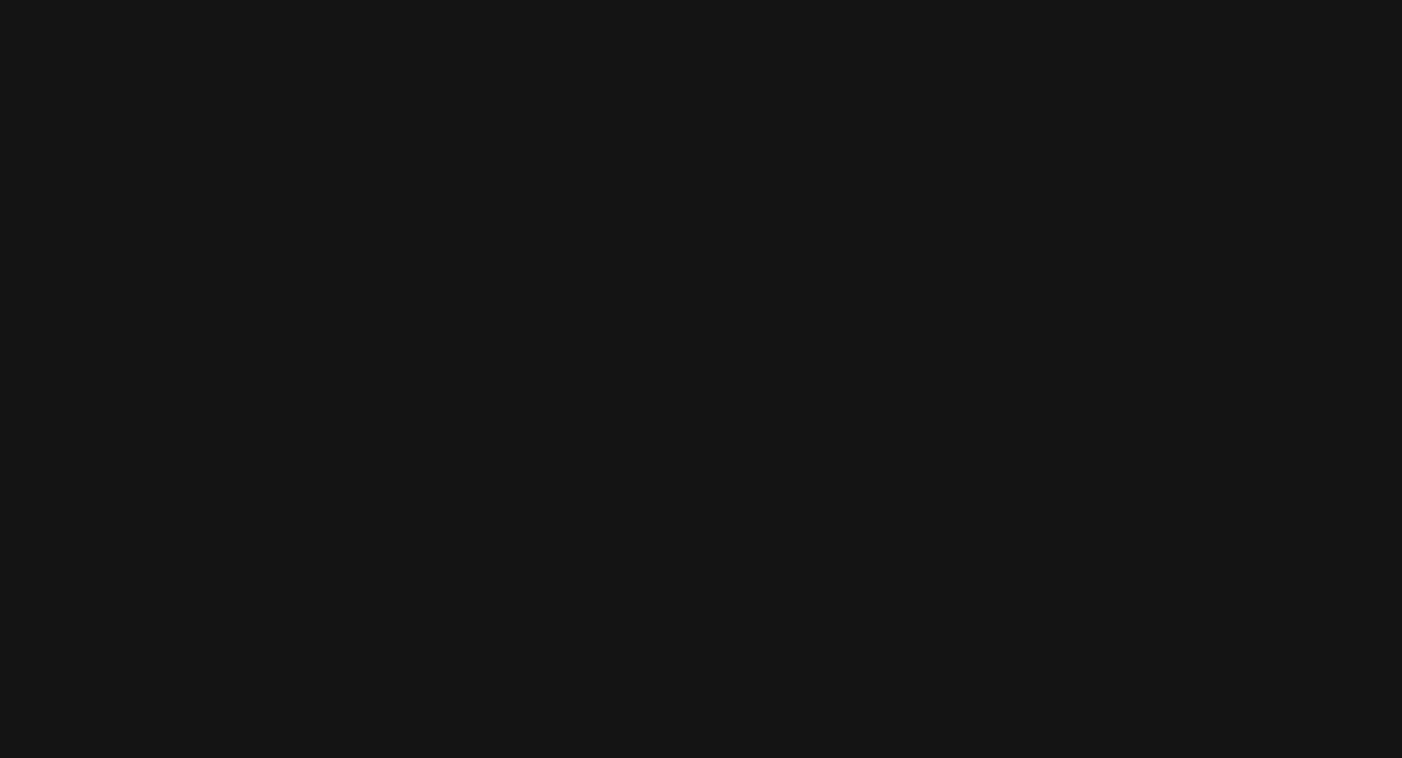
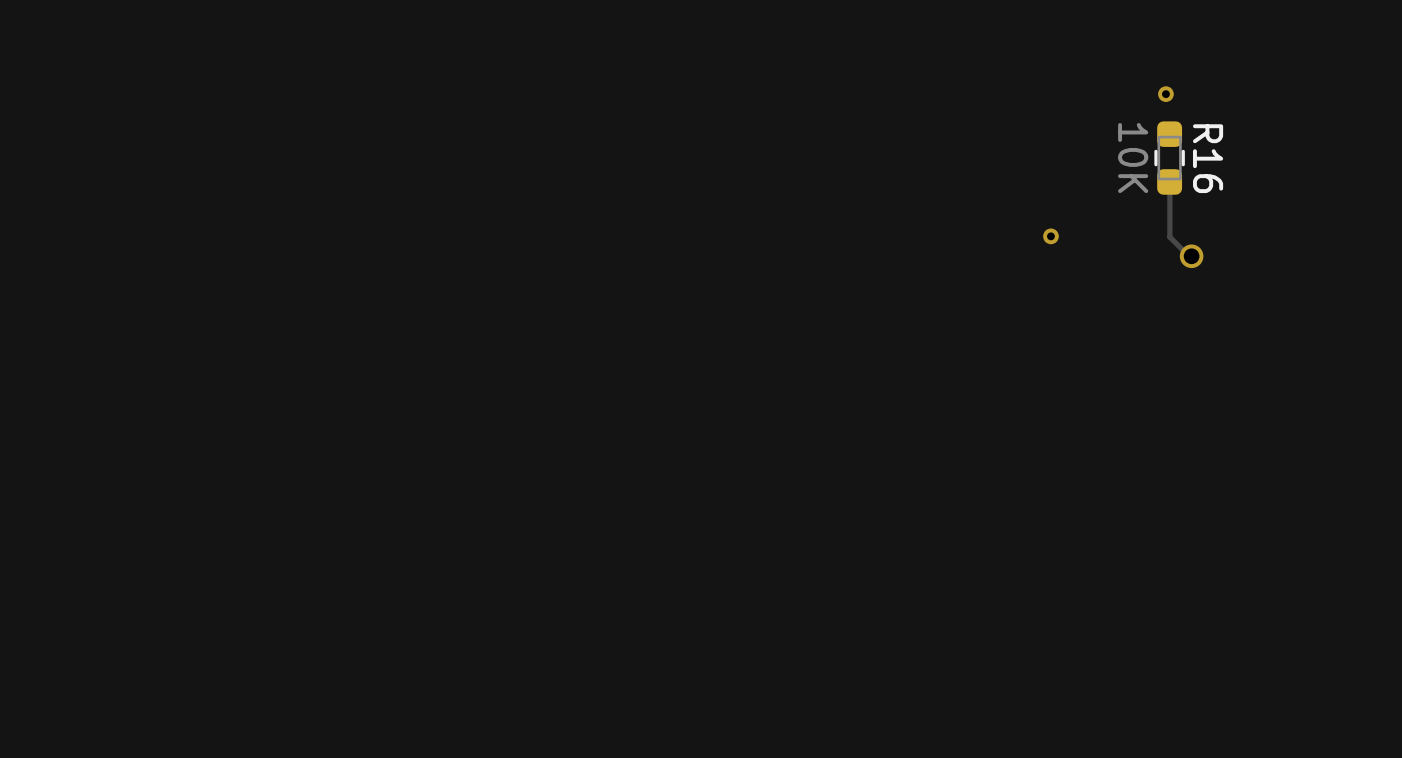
via: none -> (1165, 94)
R16: none -> 10K (1169, 158)
track: none -> (1169, 182) (1169, 237) (1189, 256) (1191, 256)
via: none -> (1050, 236)
via: none -> (1191, 256)

